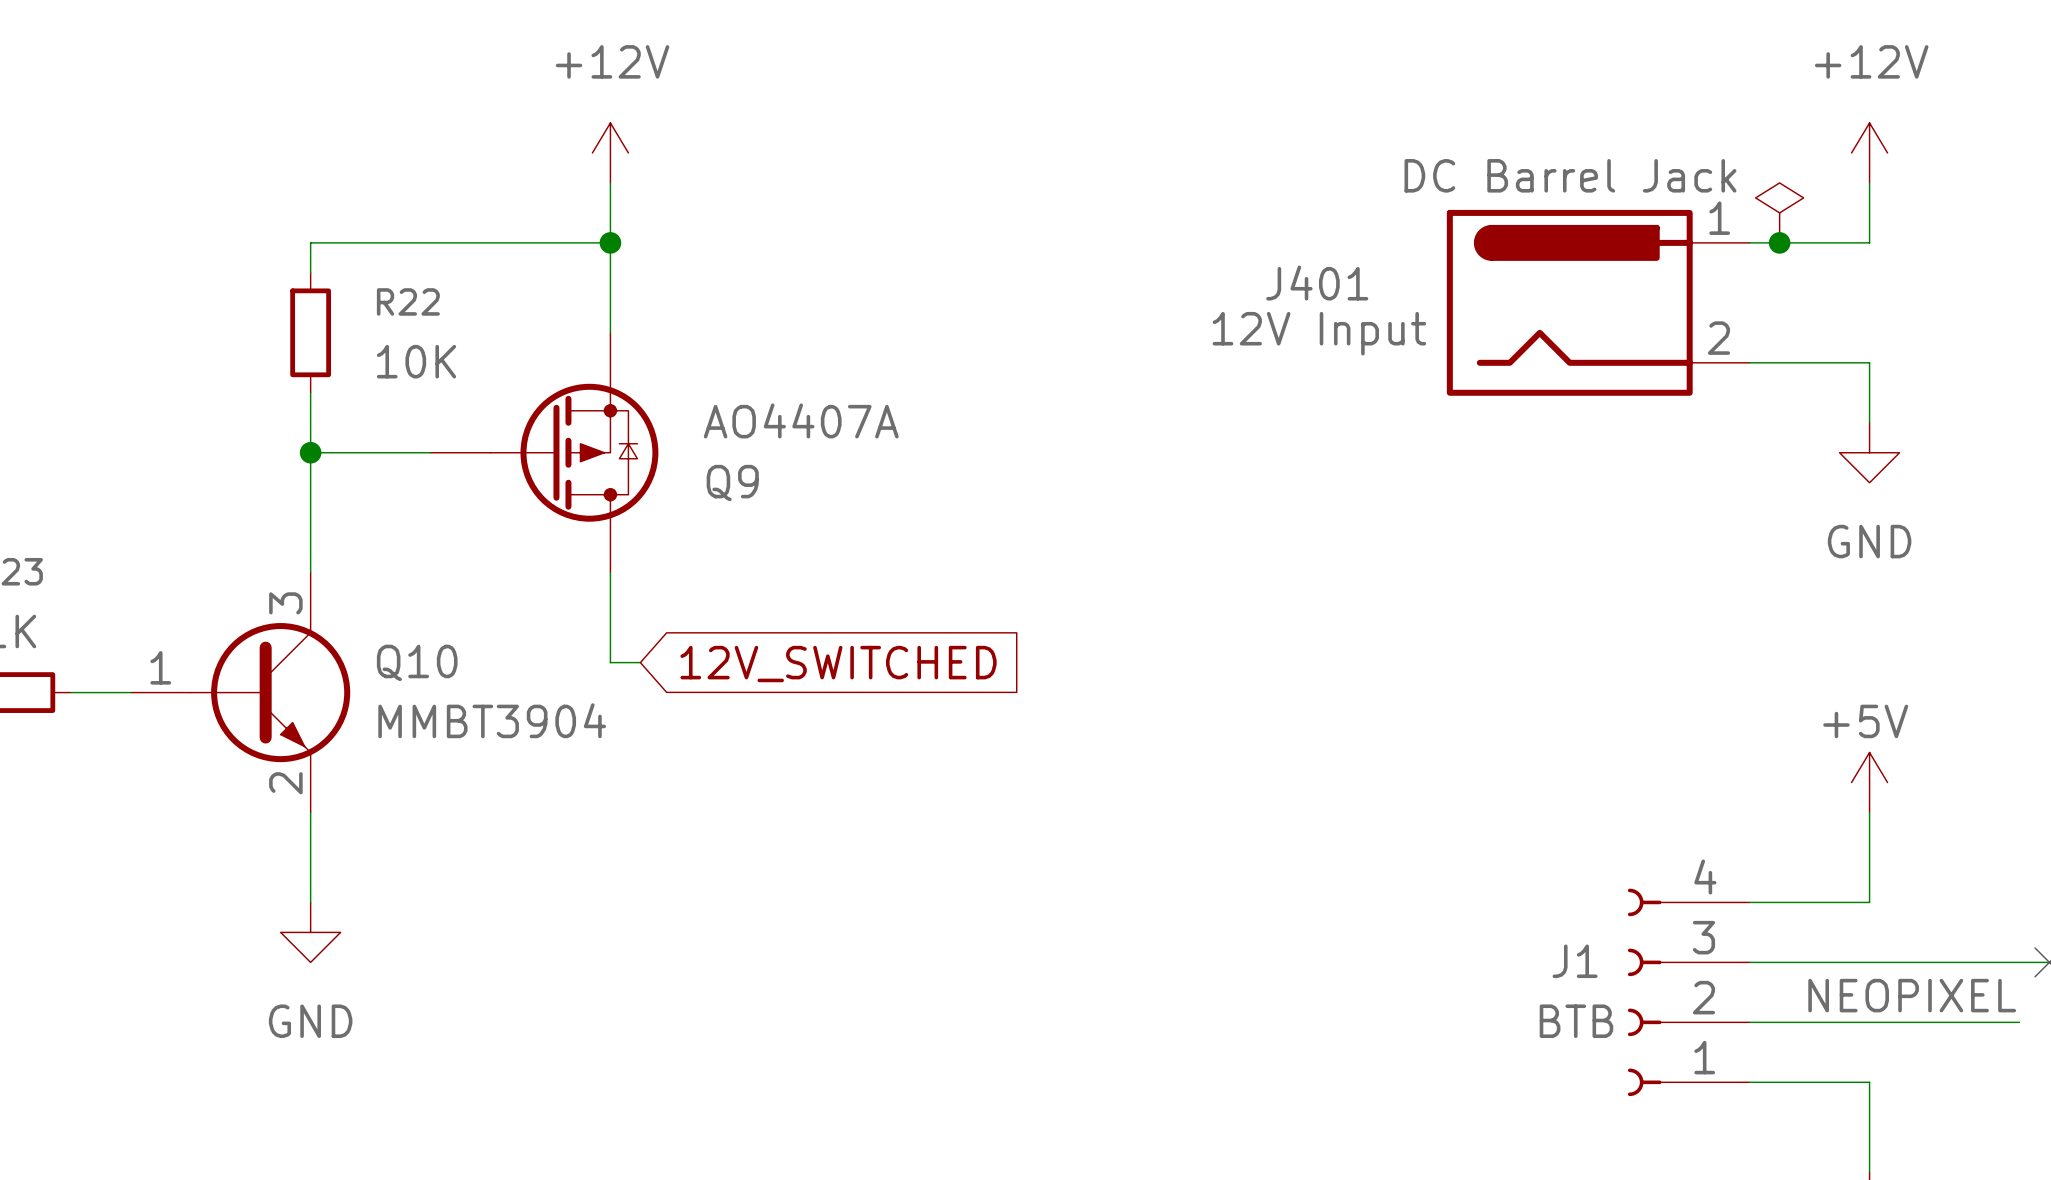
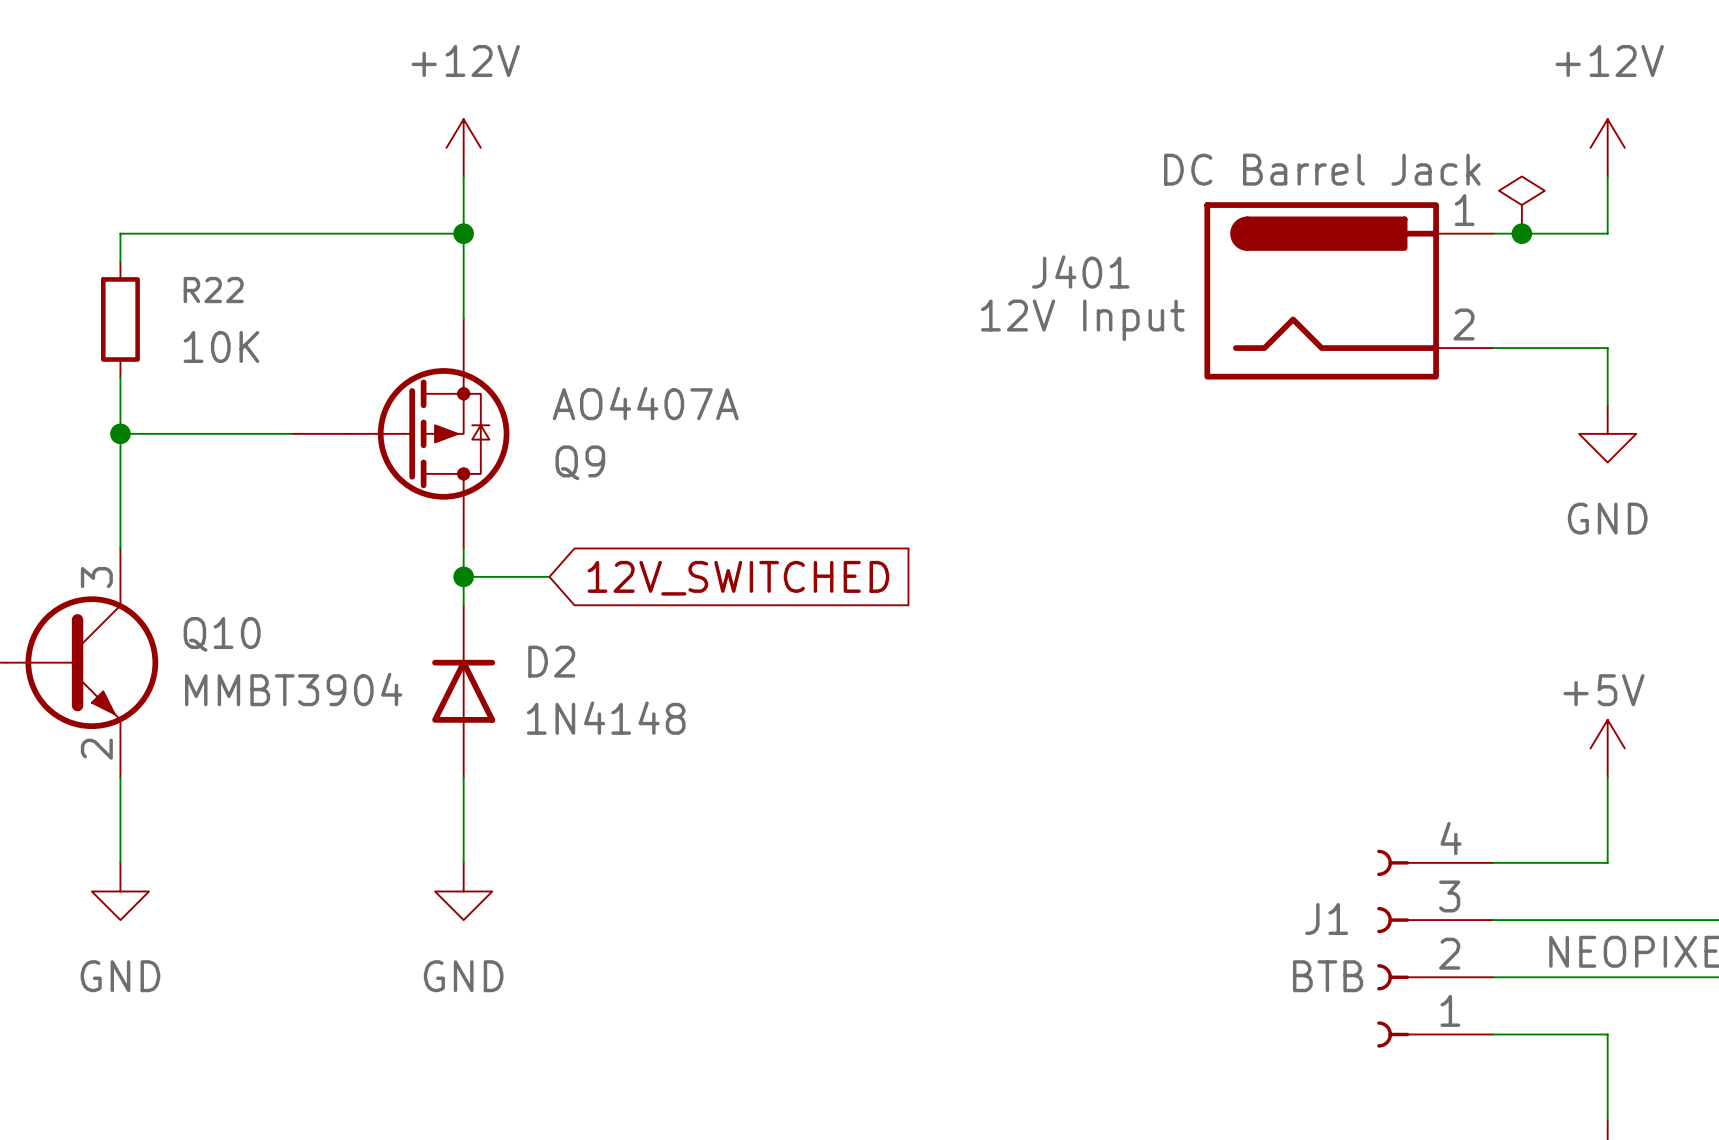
power symbol position: +12V (610, 152) -> +12V (463, 147)
wire: (610, 182) (610, 332) -> (463, 176) (463, 319)
wire: none -> (406, 233) (463, 233)
junction position: (610, 242) -> (463, 233)
Q9 position: (544, 452) -> (400, 433)
wire: (610, 572) (610, 662) (640, 662) -> none
wire: none -> (463, 548) (463, 605)
wire: none -> (463, 576) (549, 576)
junction: none -> (463, 576)
global label position: 12V_SWITCHED (838, 664) -> 12V_SWITCHED (738, 578)
D2: none -> 1N4148 (463, 691)
wire: none -> (463, 777) (463, 862)
power symbol: none -> GND (463, 891)

